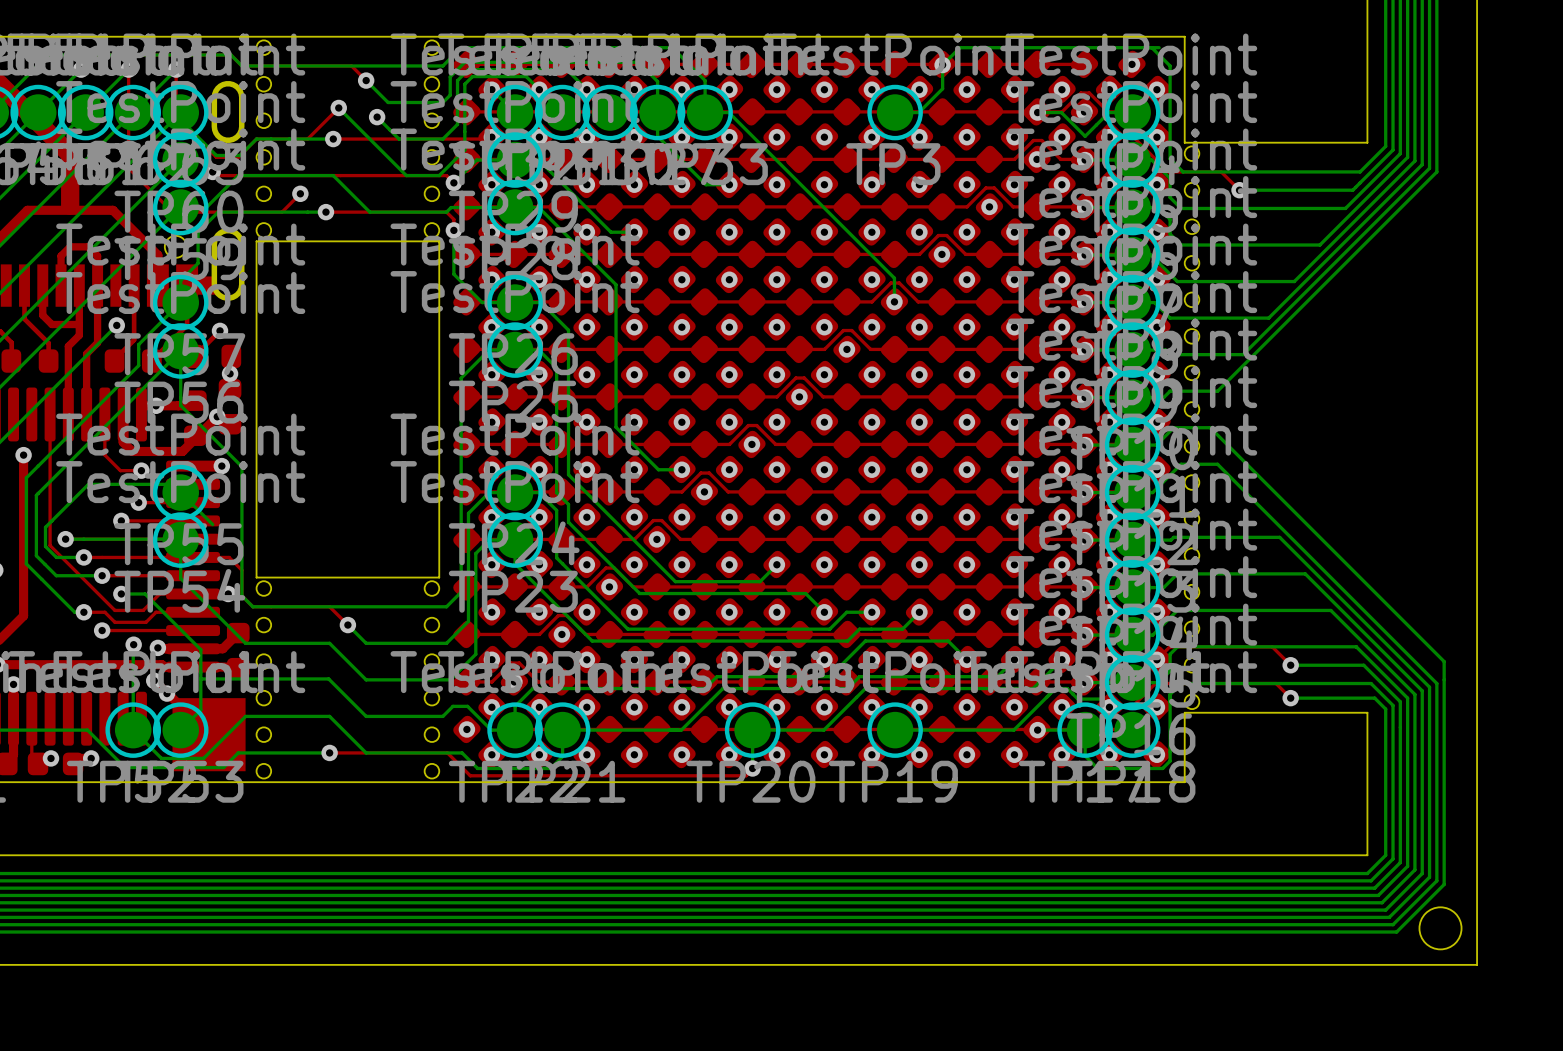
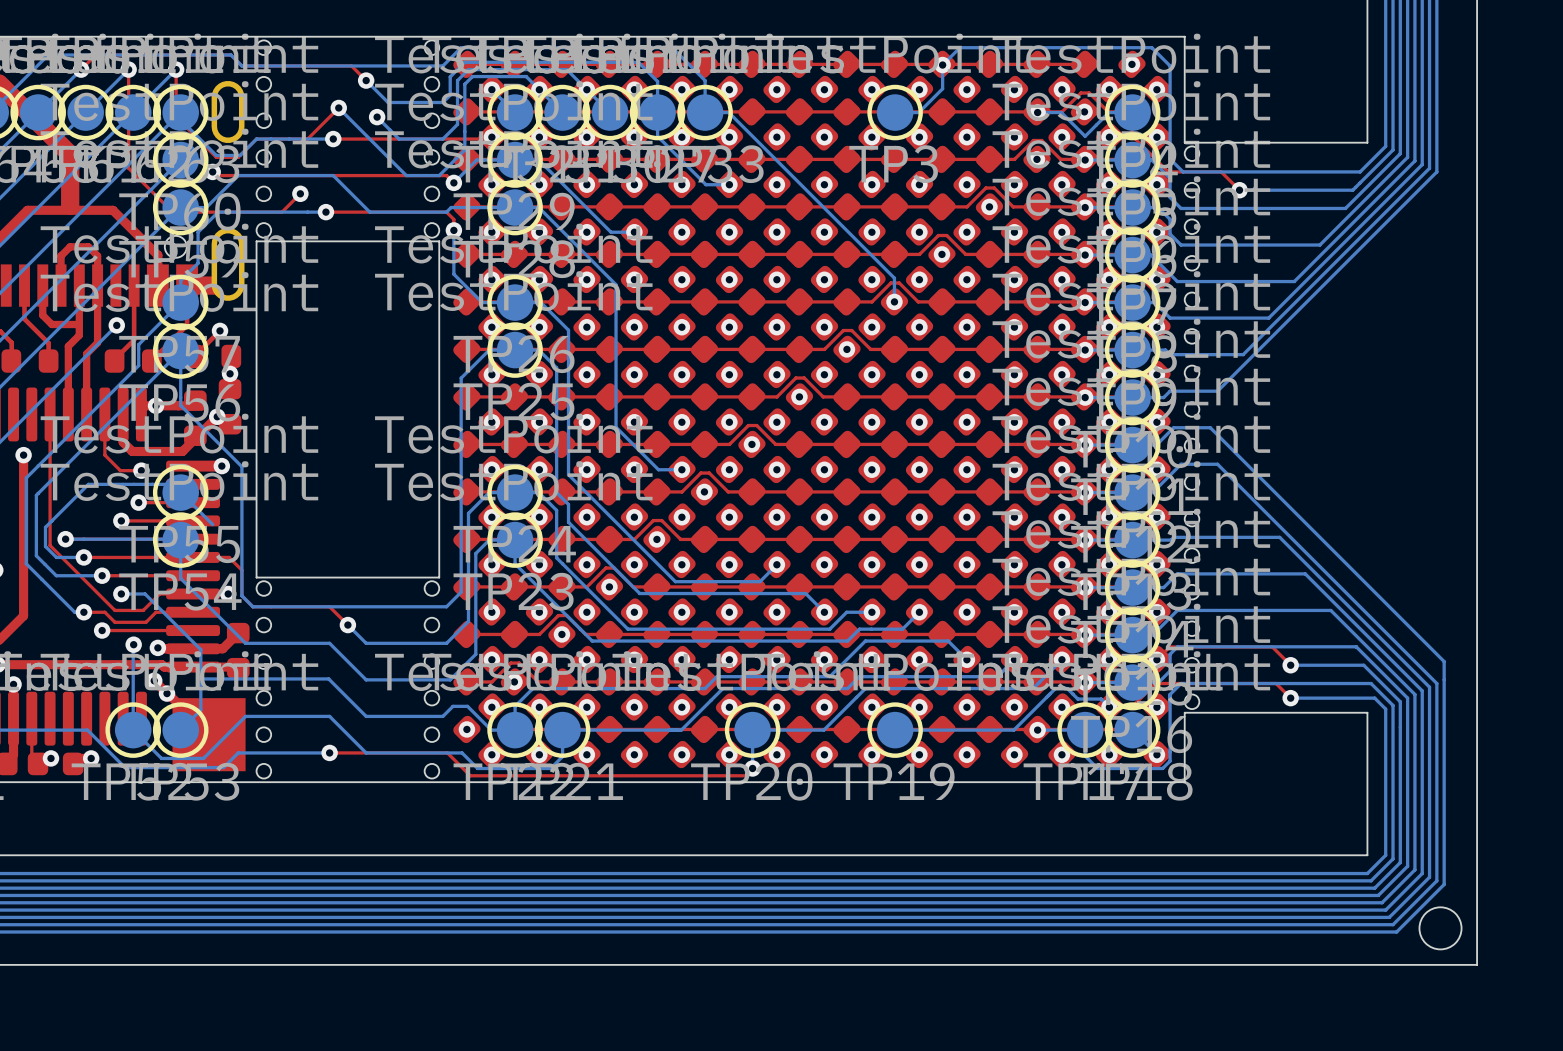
bottom track: (1159, 47) (1151, 47) -> none

